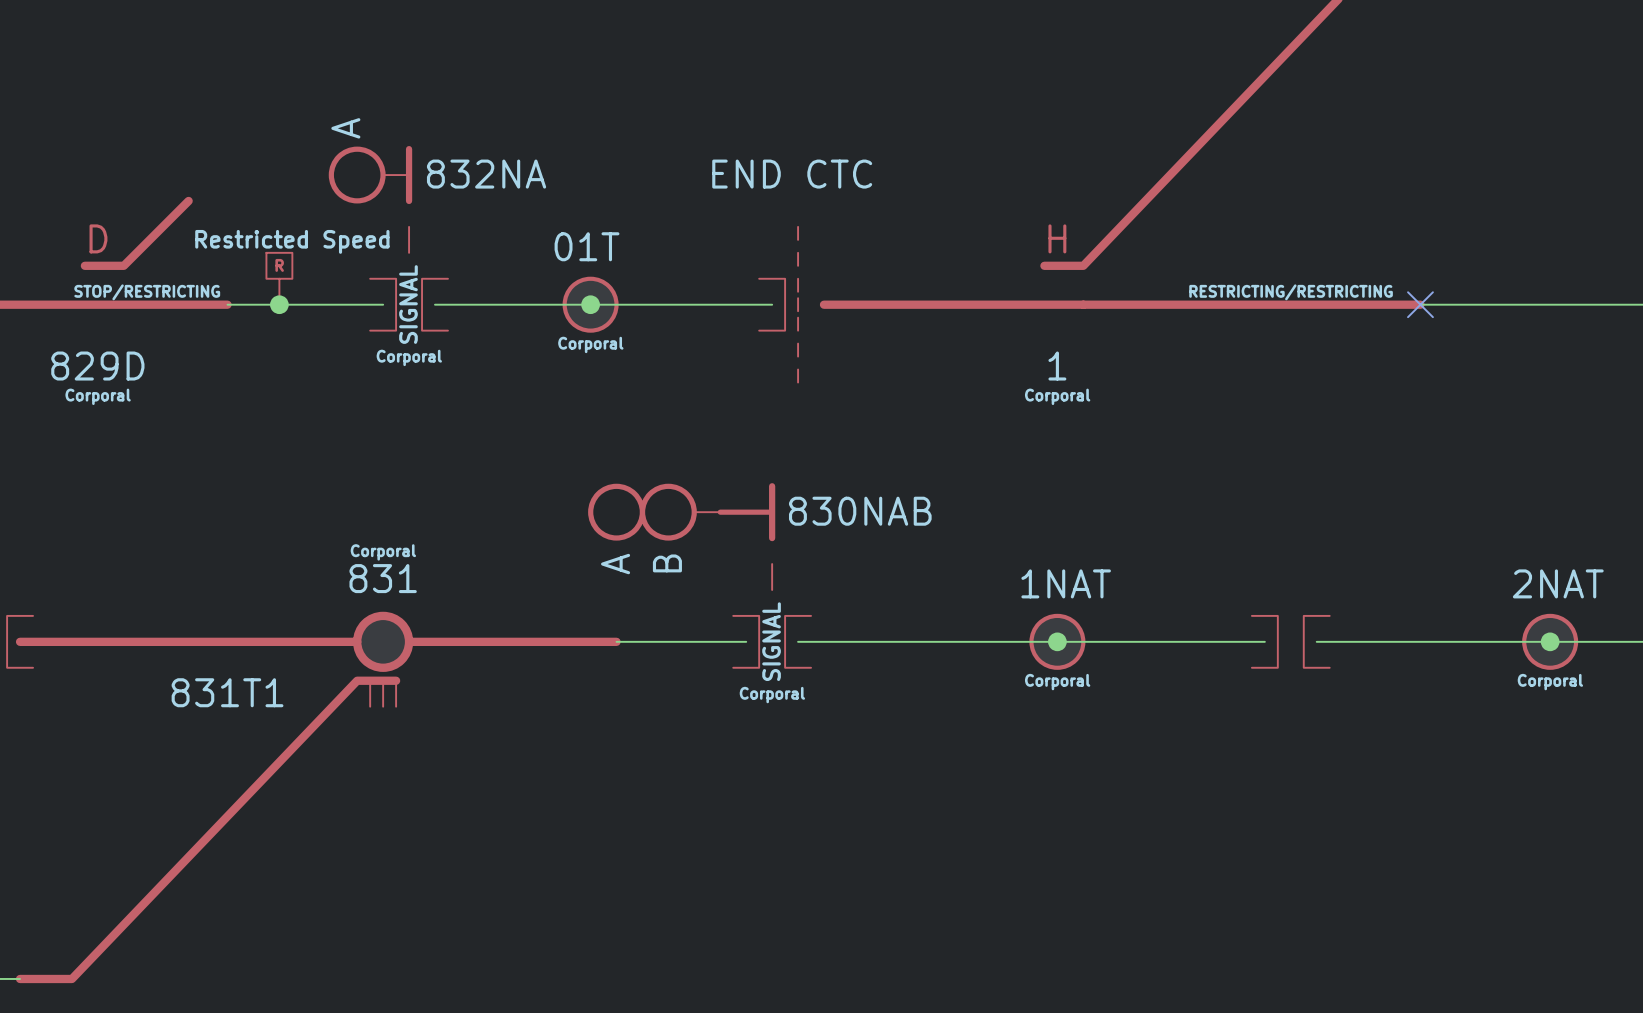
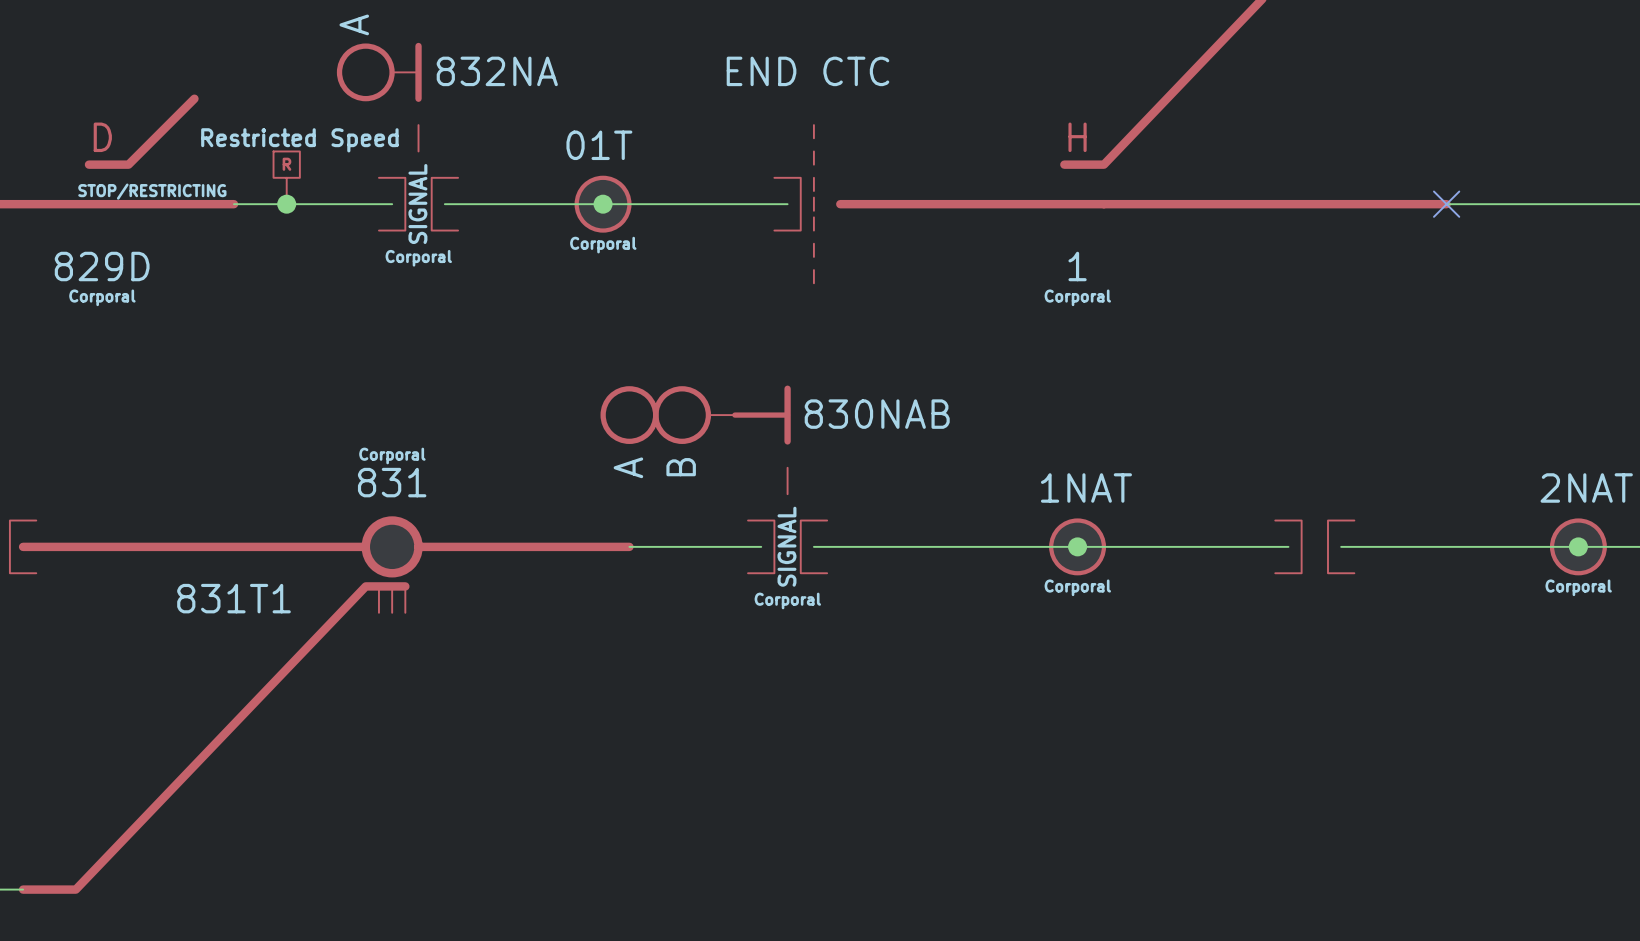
part text: RESTRICTING/RESTRICTING (1291, 292) -> none

